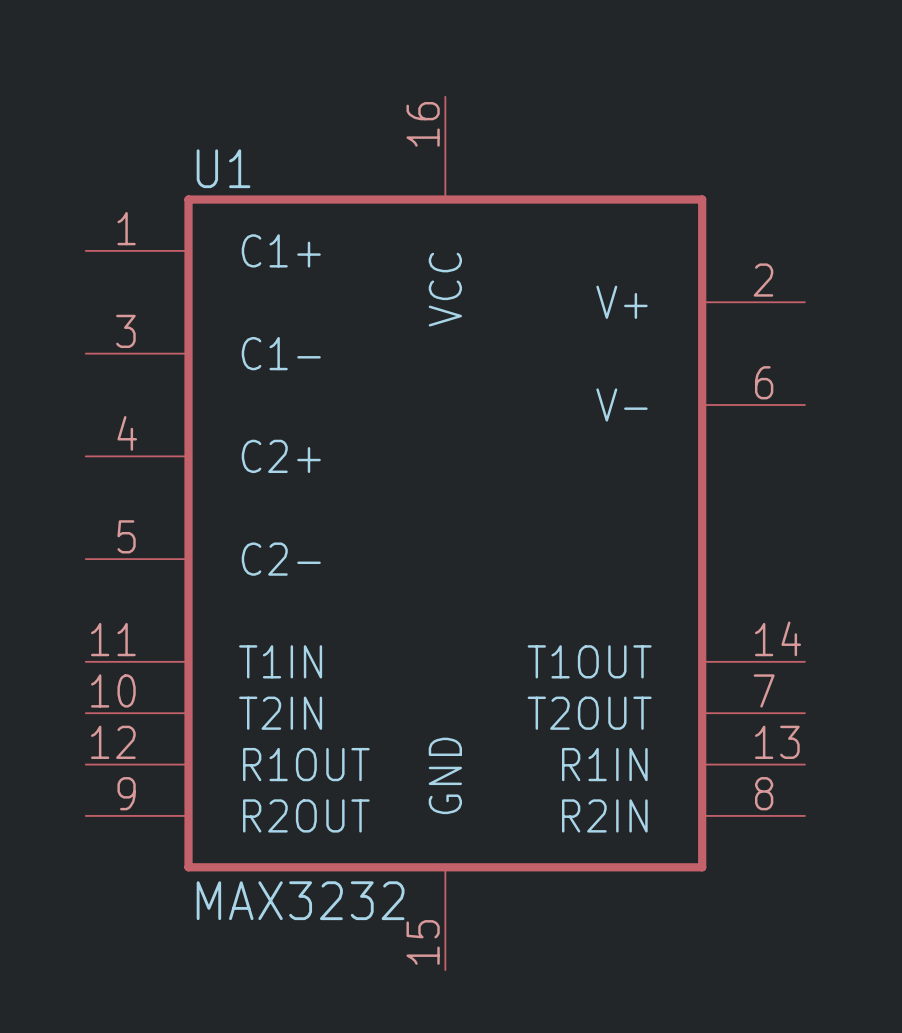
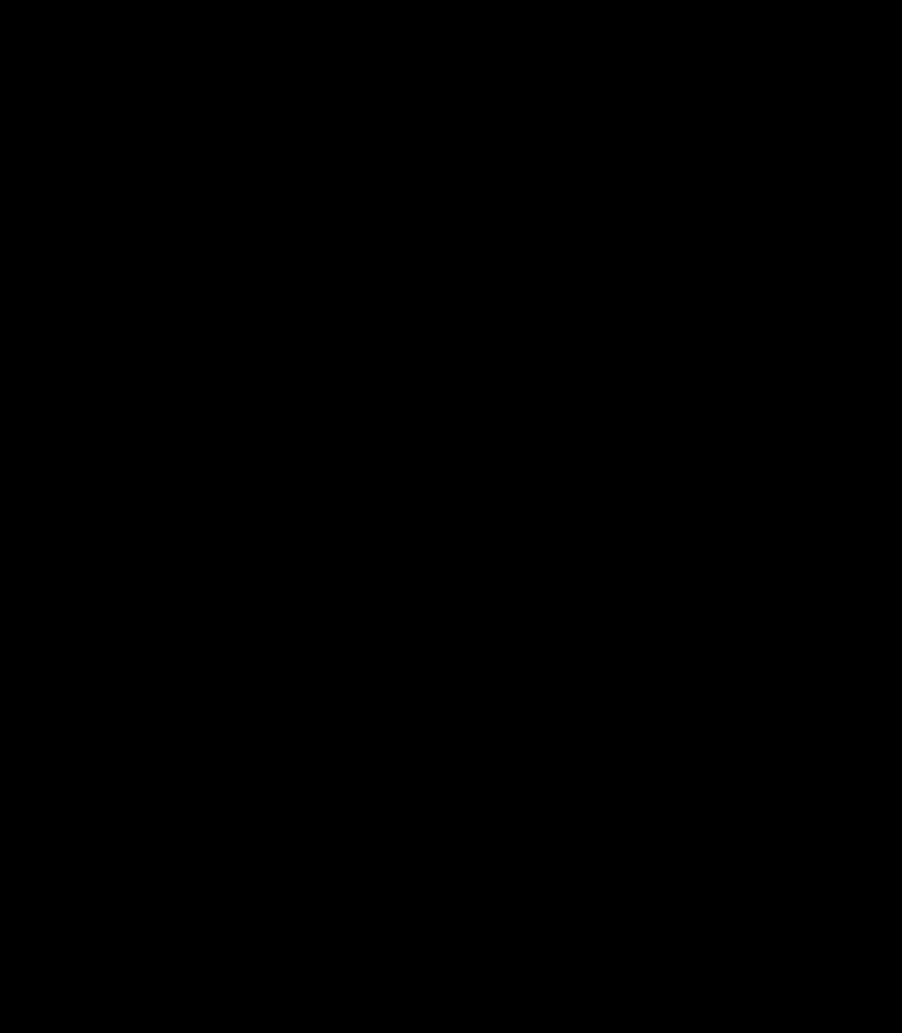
U1: MAX3232 (445, 533) -> none

